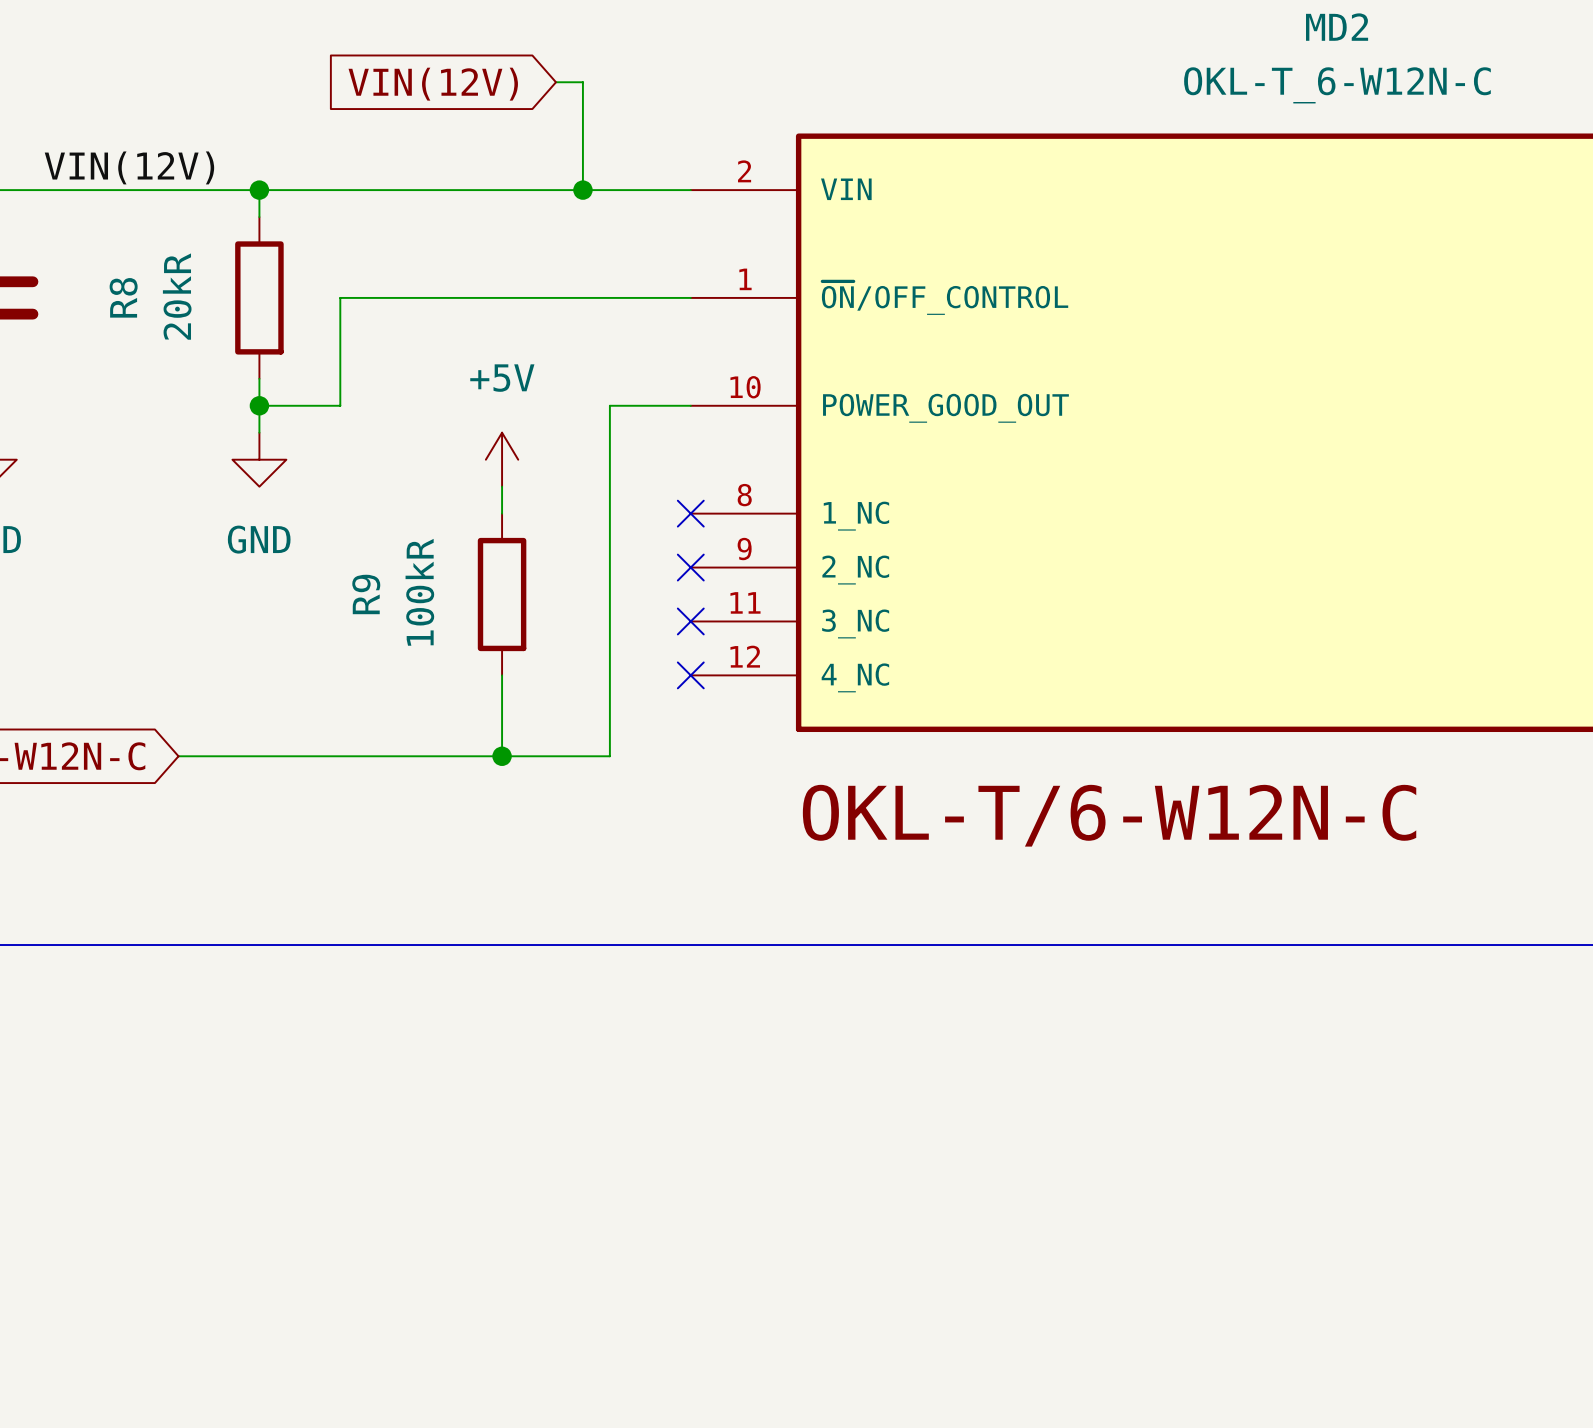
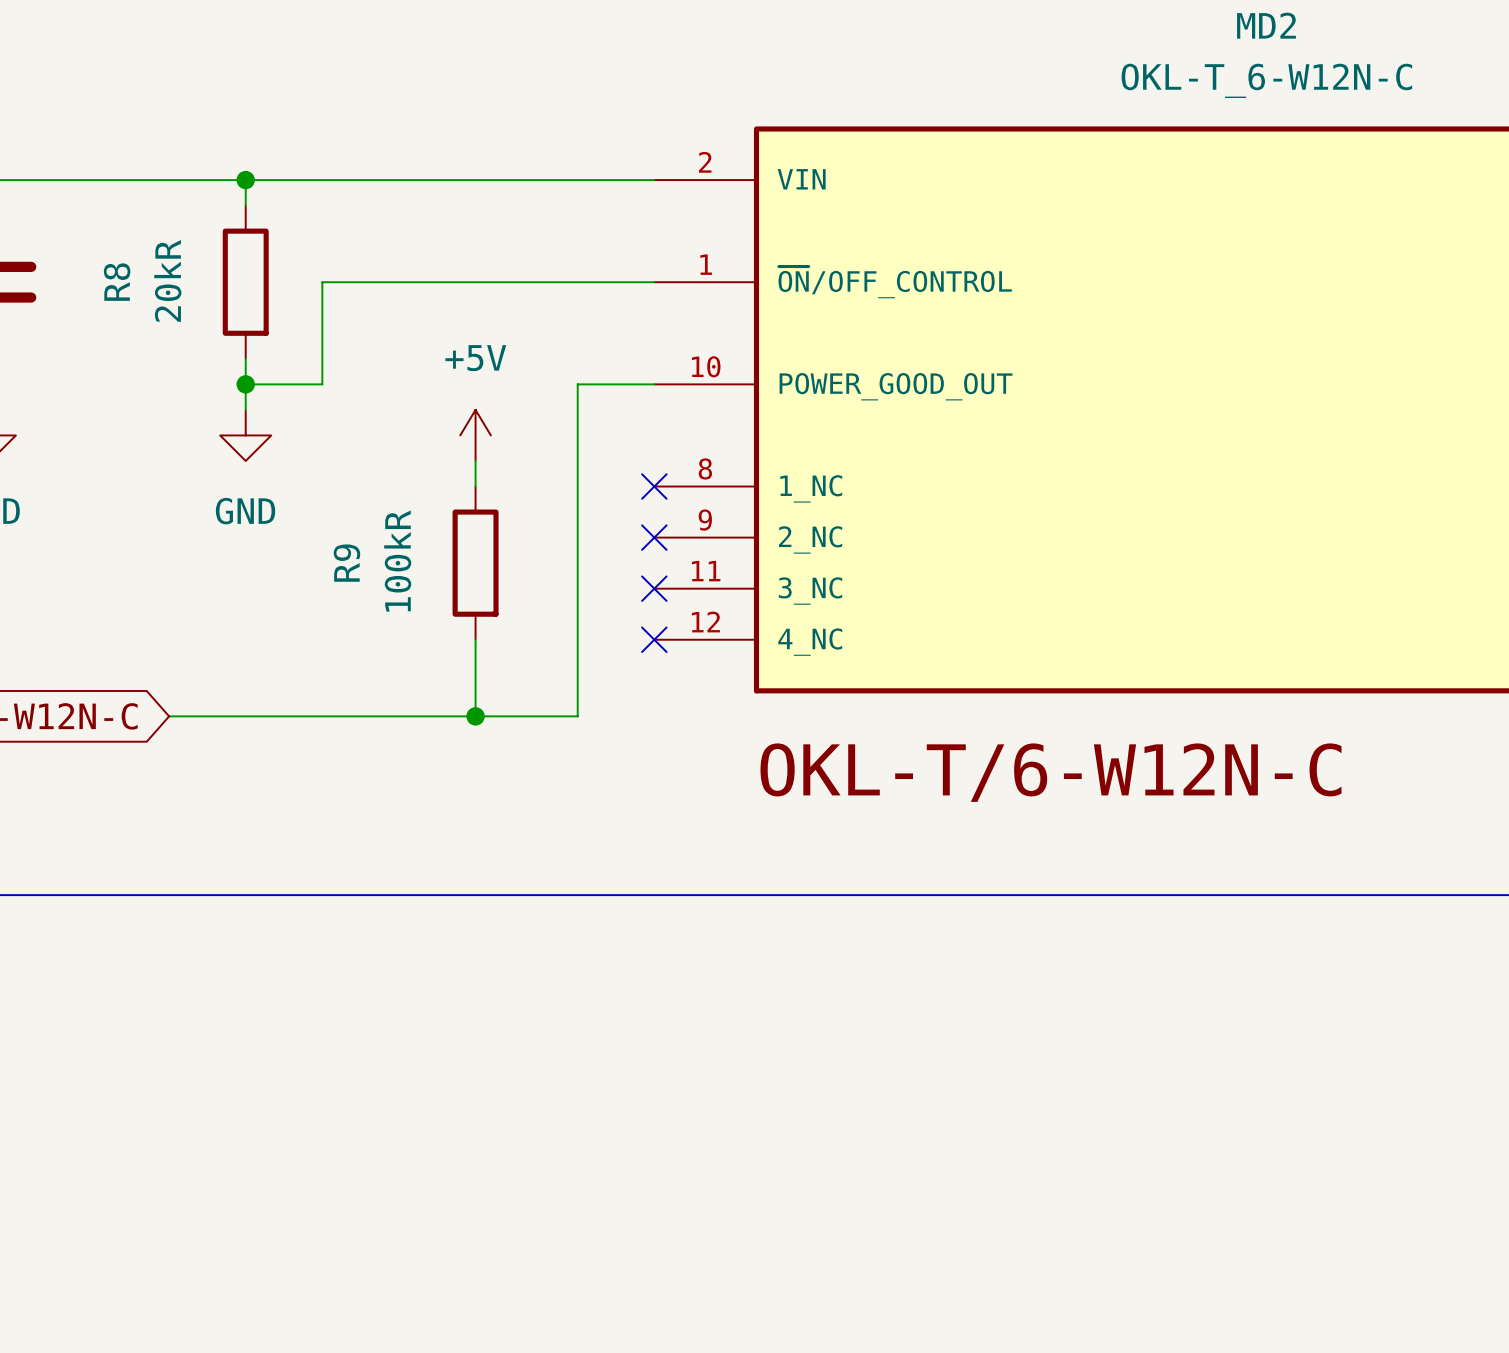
wire: (555, 82) (582, 82) (582, 190) -> none
global label: VIN(12V) (433, 84) -> none
label: VIN(12V) (129, 167) -> none
junction: (582, 190) -> none

